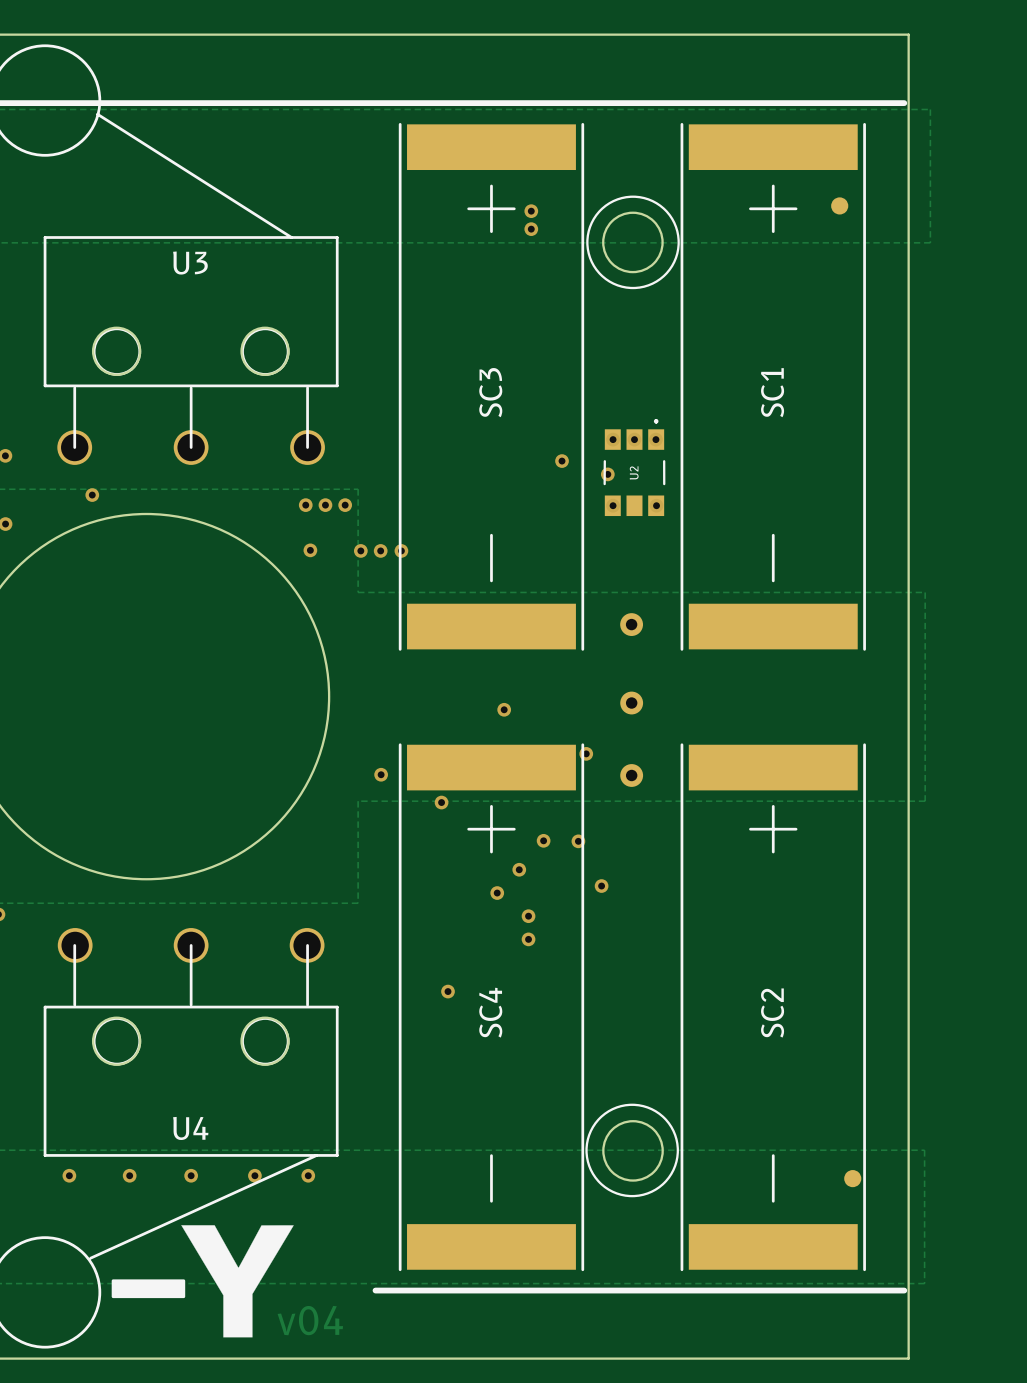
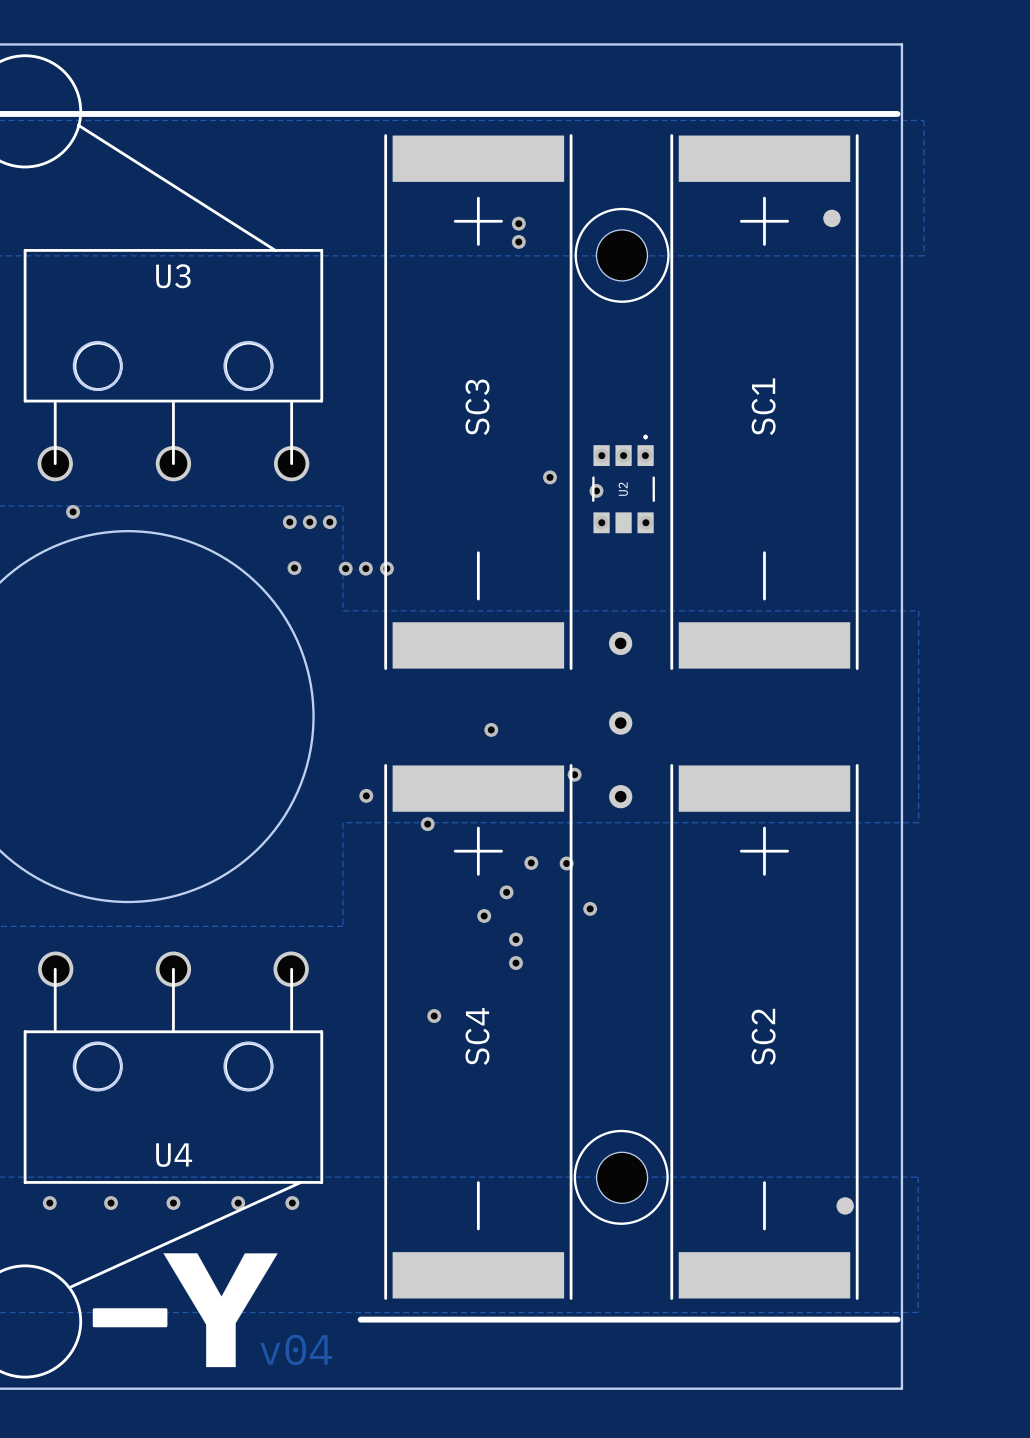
round board edge: [602, 211, 664, 274] -> none
part: none -> (621, 255)
round board edge: [602, 1120, 664, 1182] -> none
part: none -> (622, 1177)

